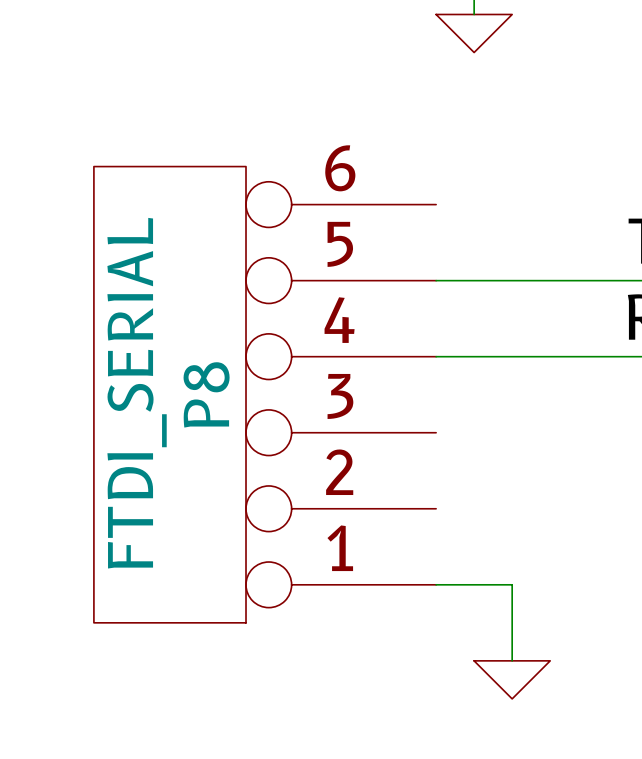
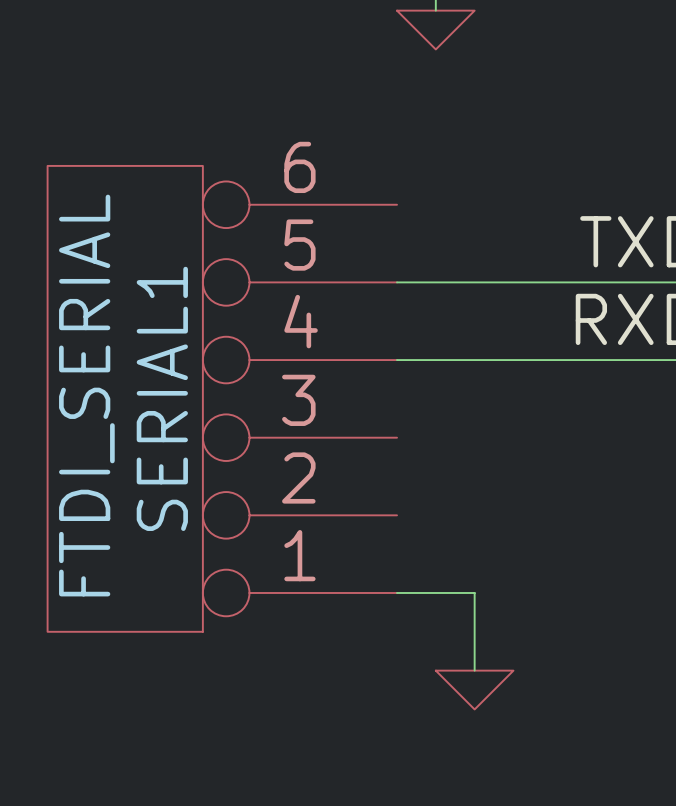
P8 name: P8 (206, 394) -> SERIAL1 (162, 398)

